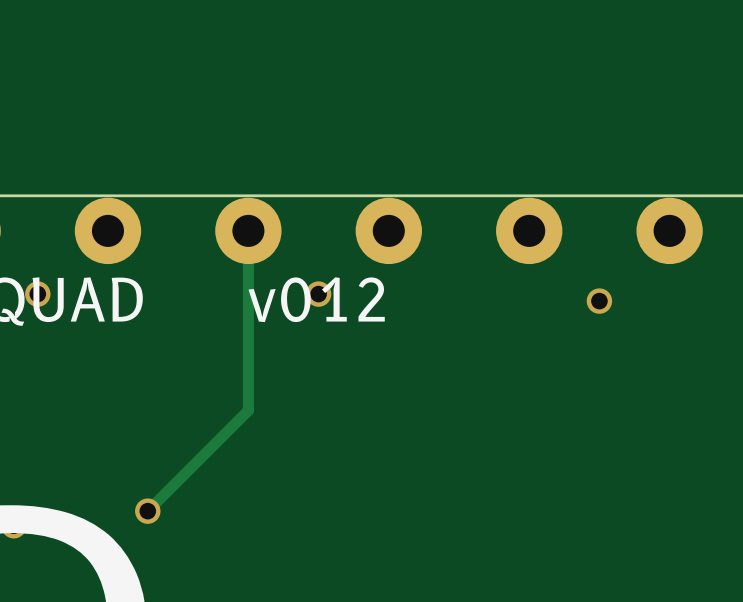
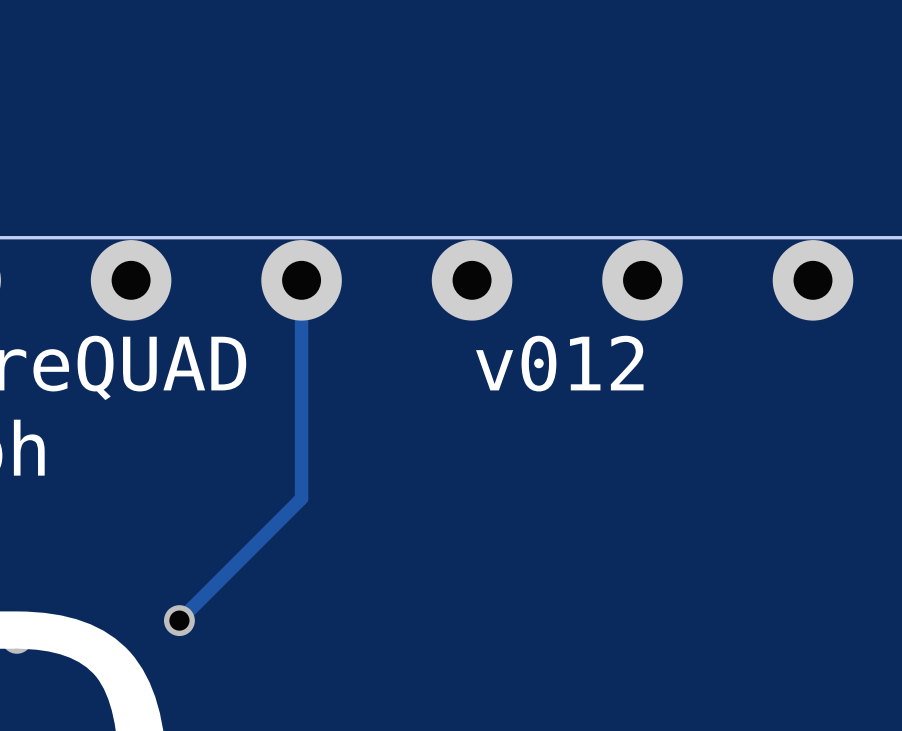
via: (37, 294) -> none
via: (318, 294) -> none
via: (599, 301) -> none

